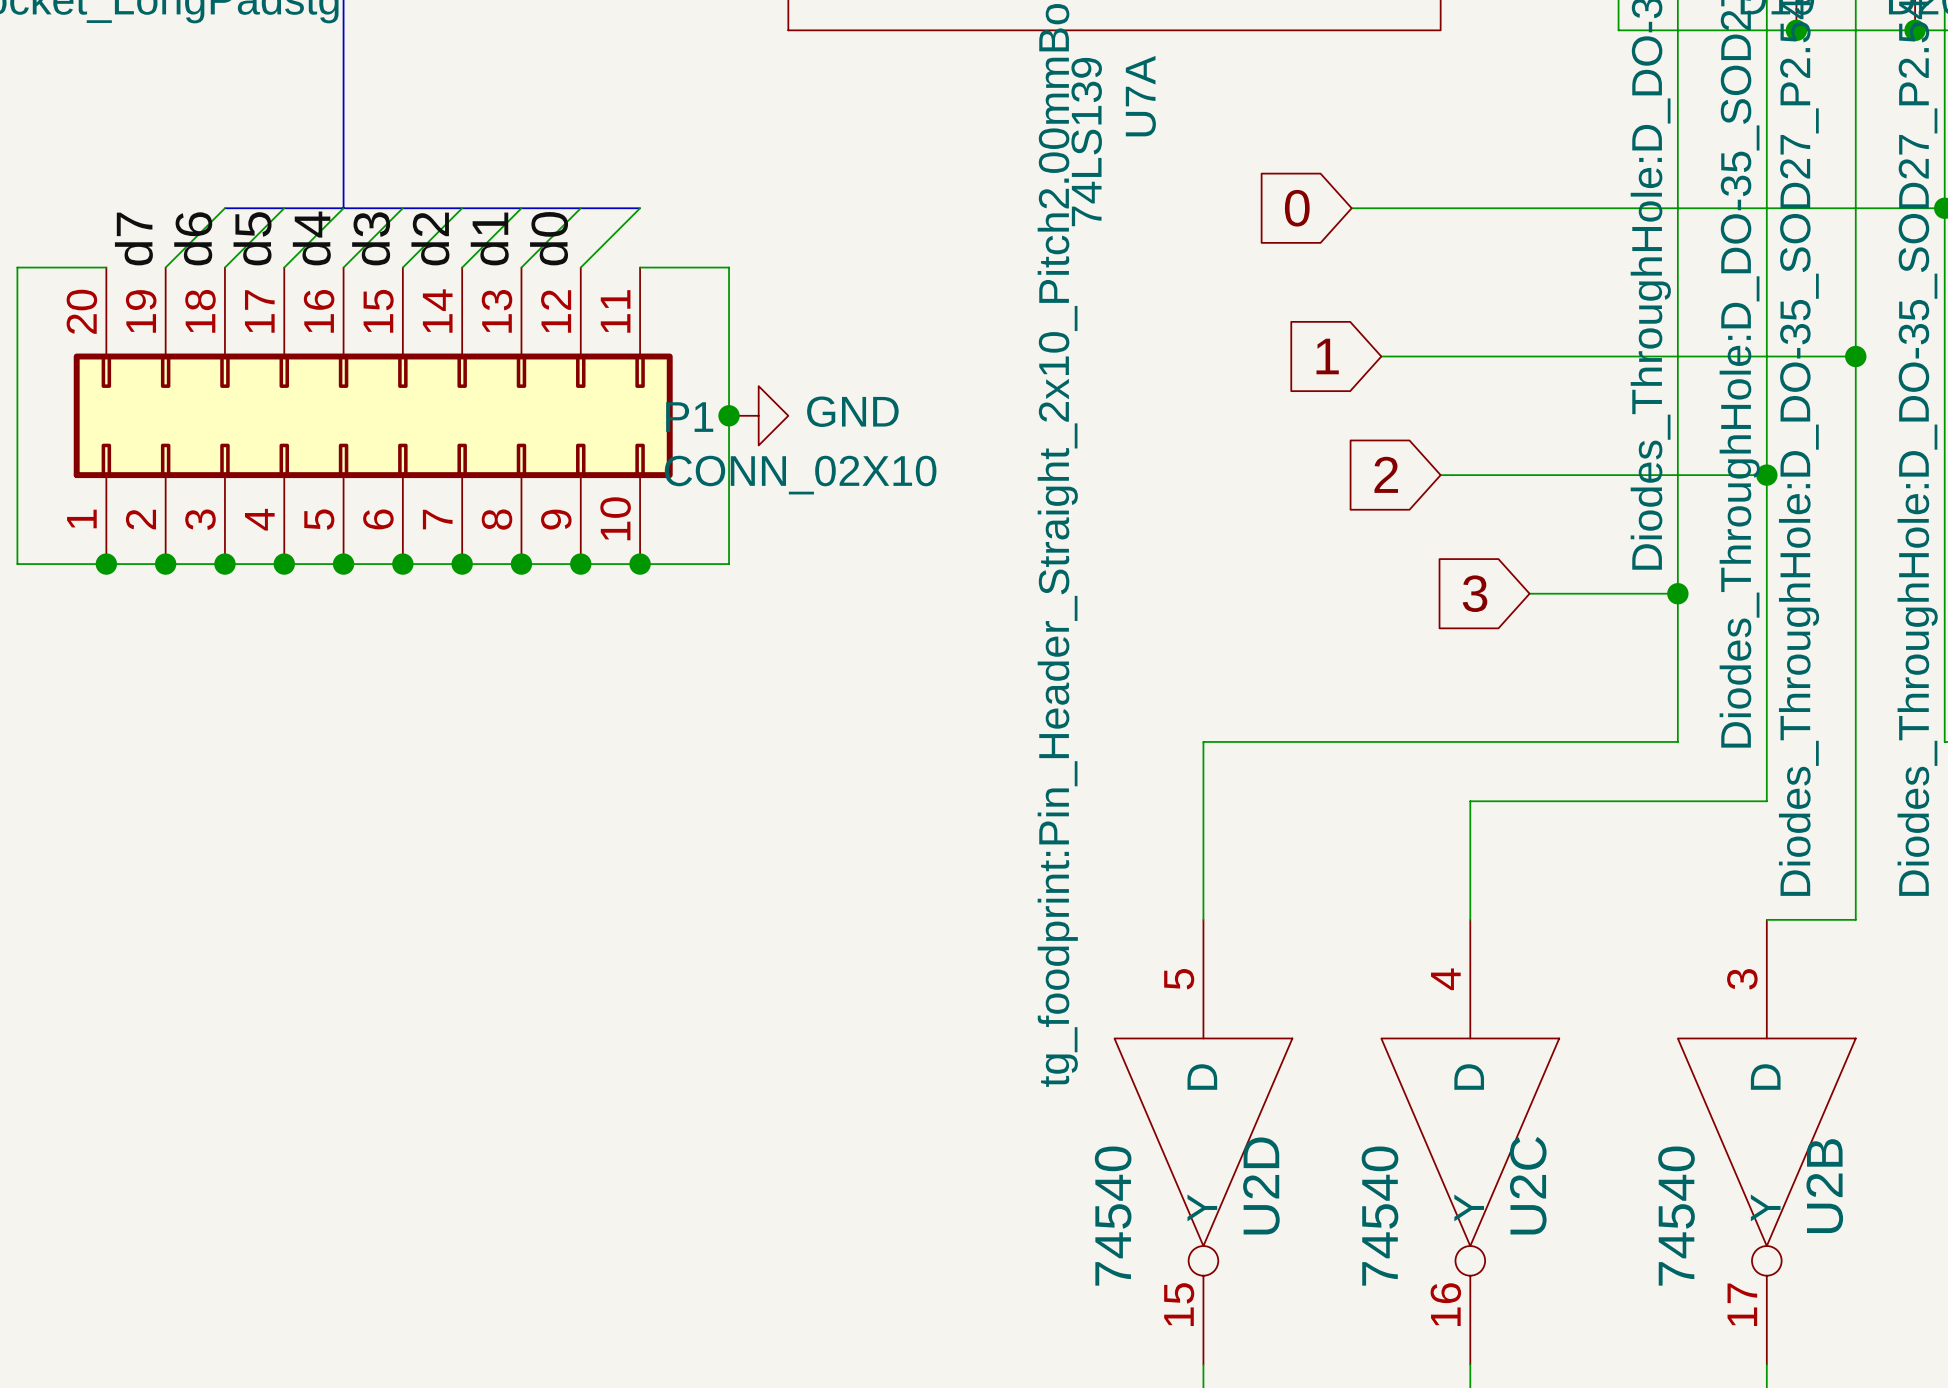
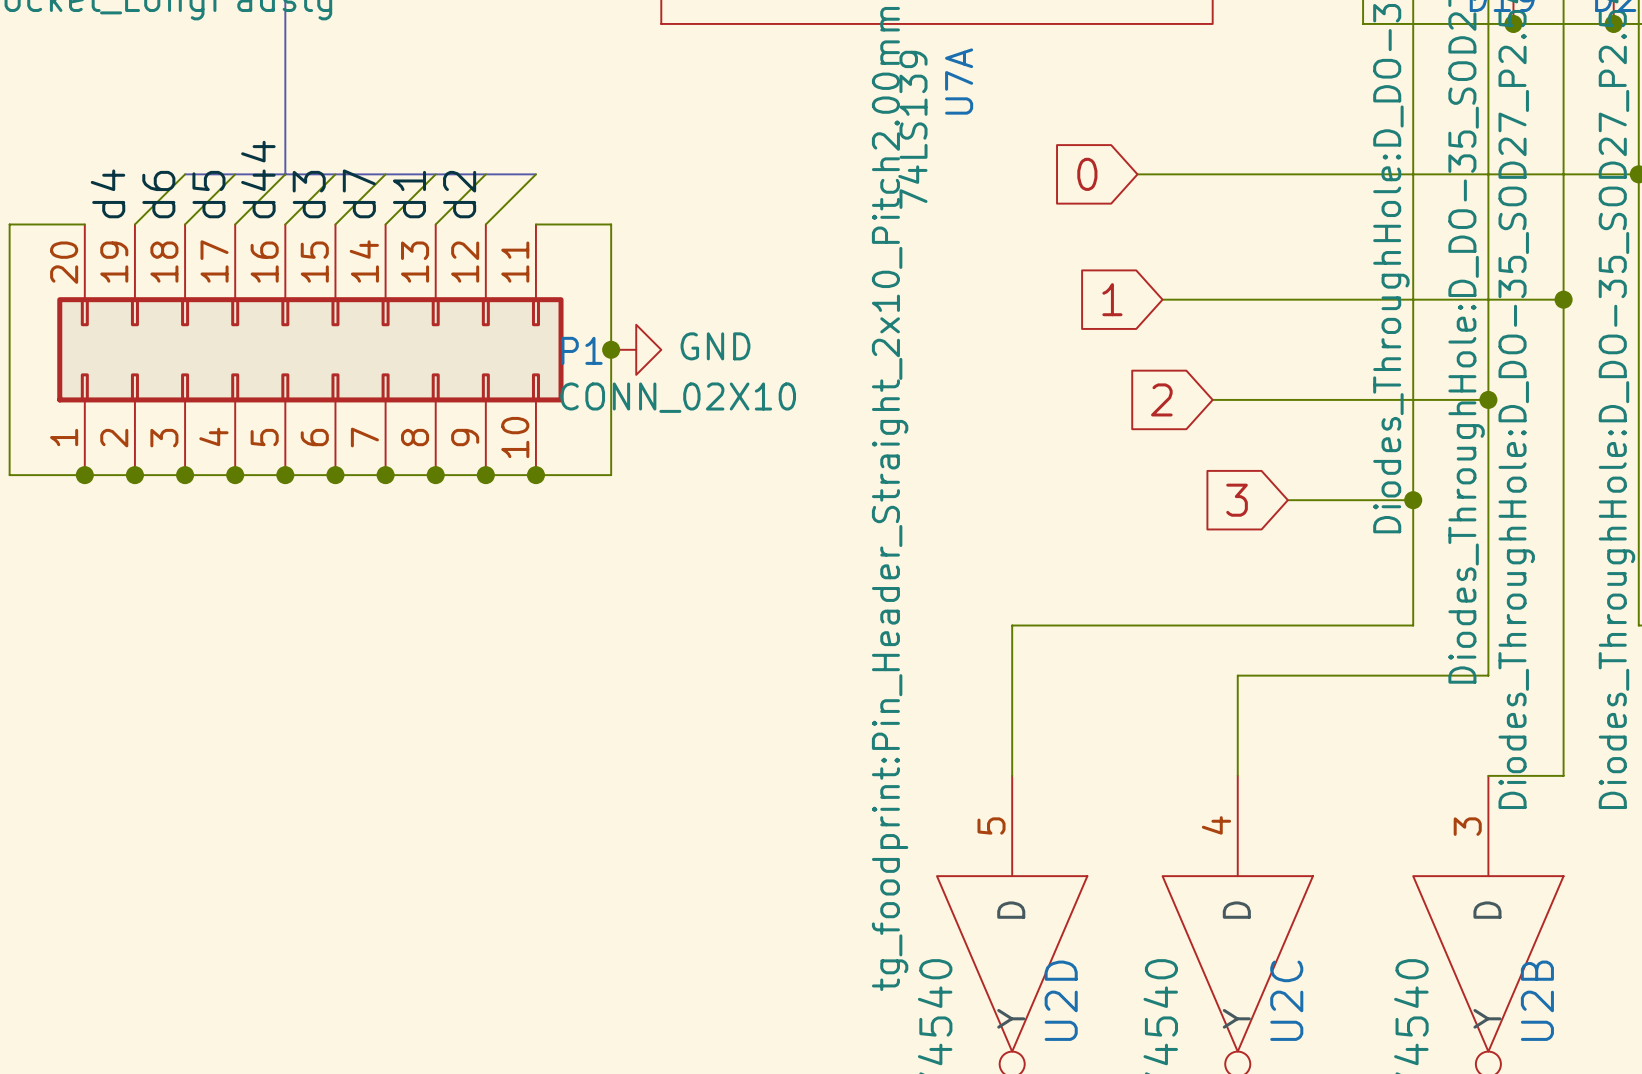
label: d4 (311, 238) -> d44 (258, 179)
label: d0 (549, 238) -> d2 (459, 194)
label: d7 (133, 239) -> d4 (107, 193)
label: d2 (430, 239) -> d7 (359, 193)

